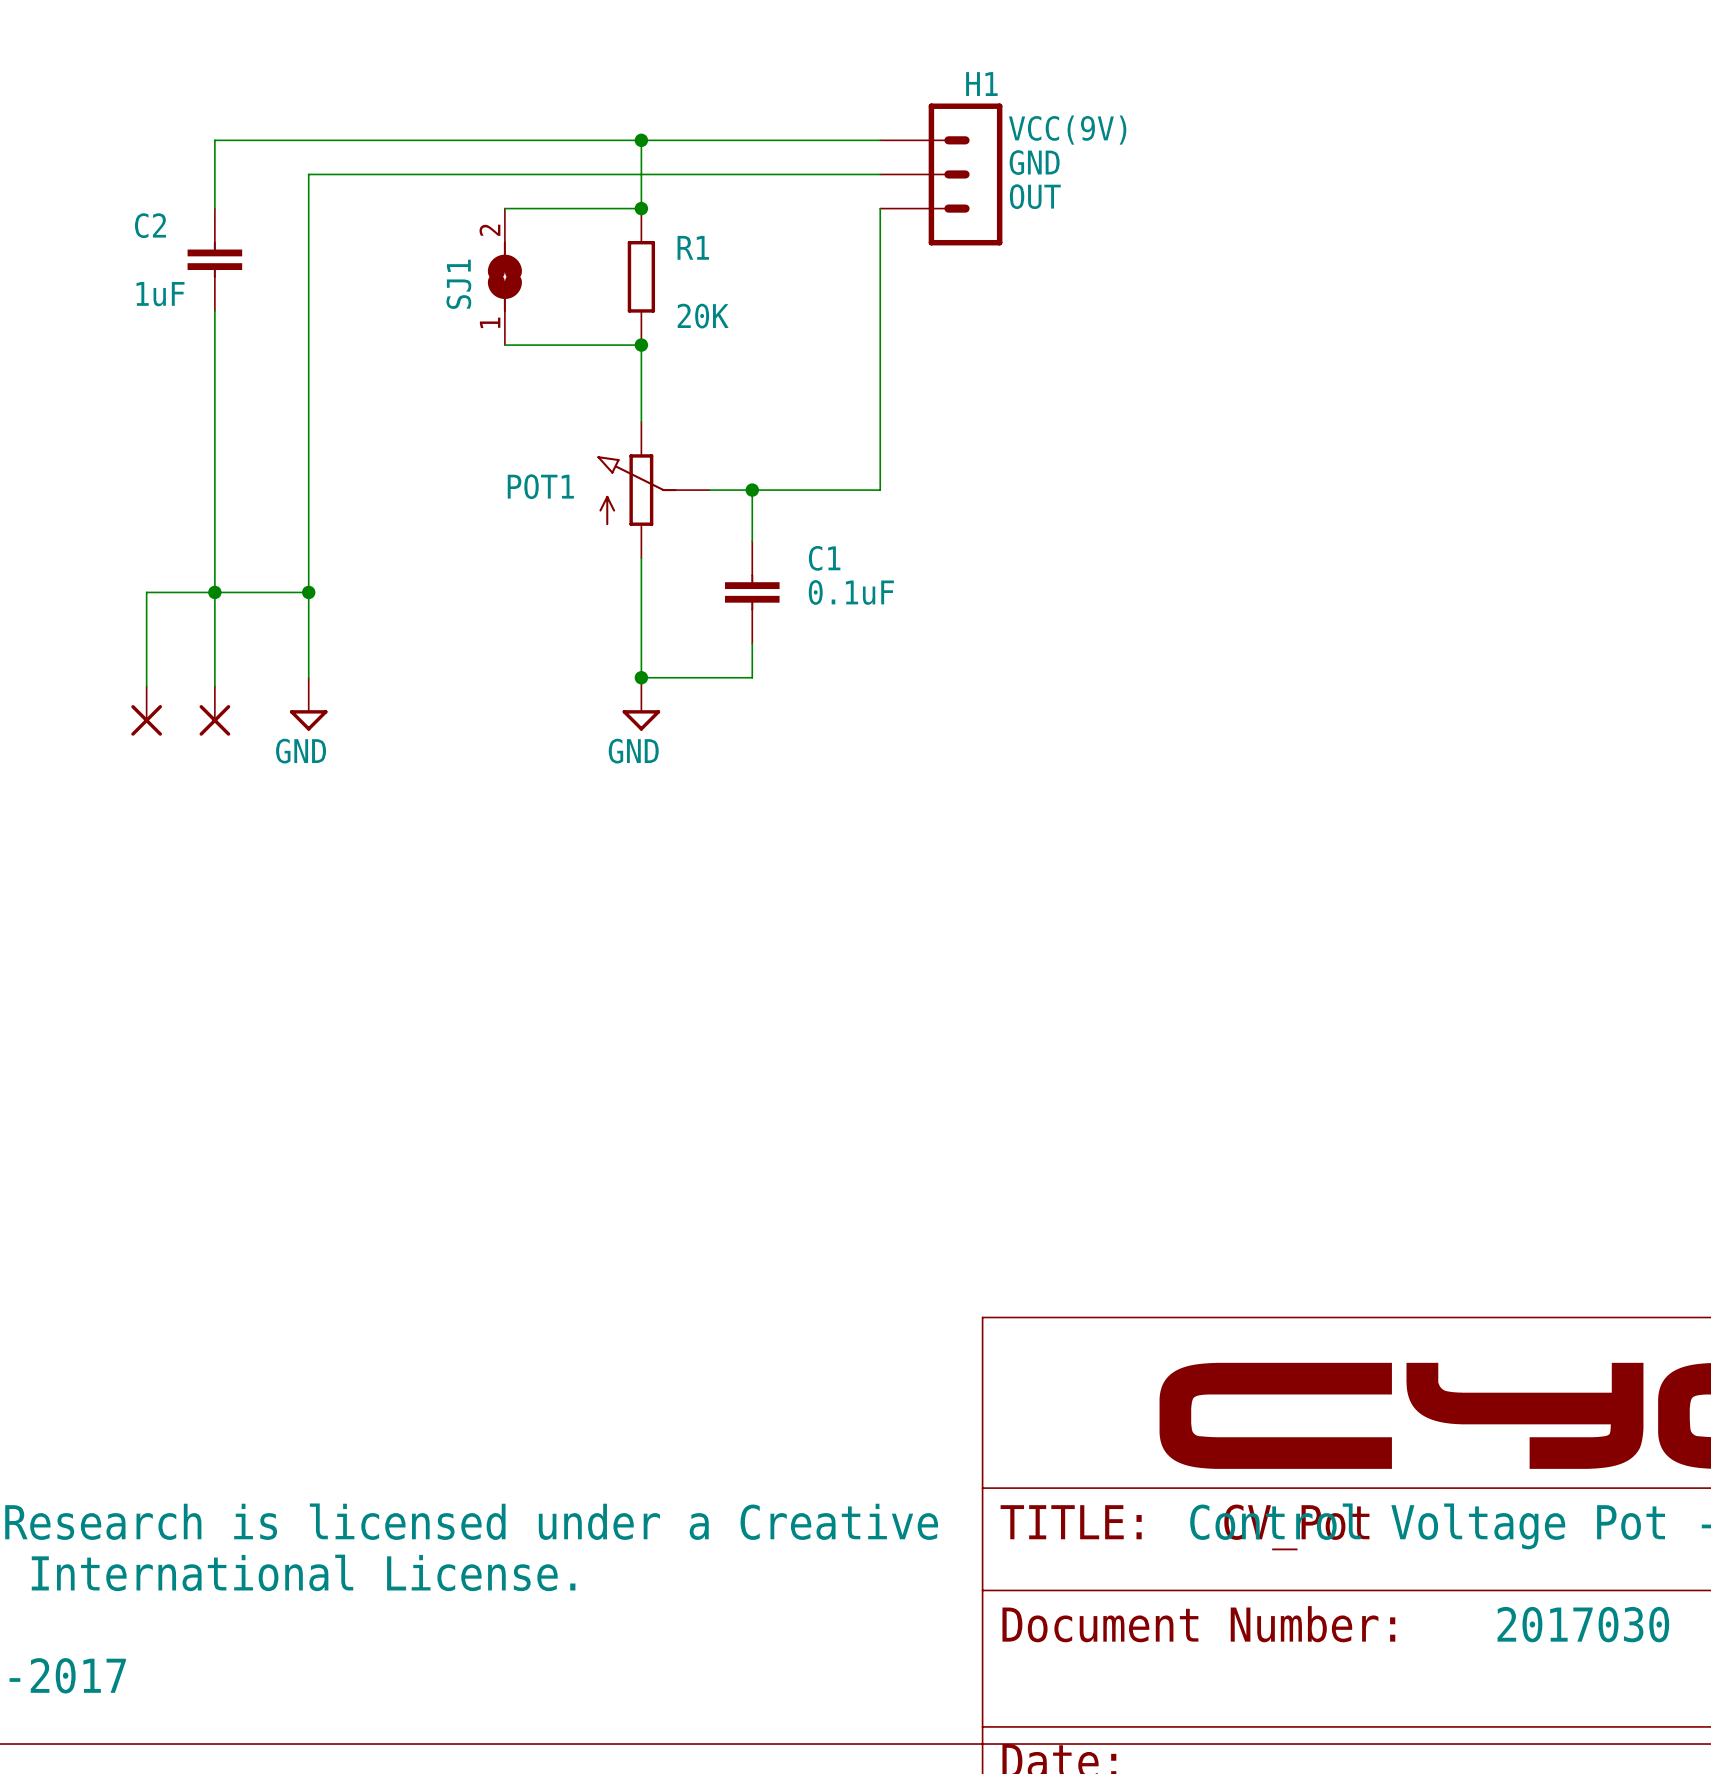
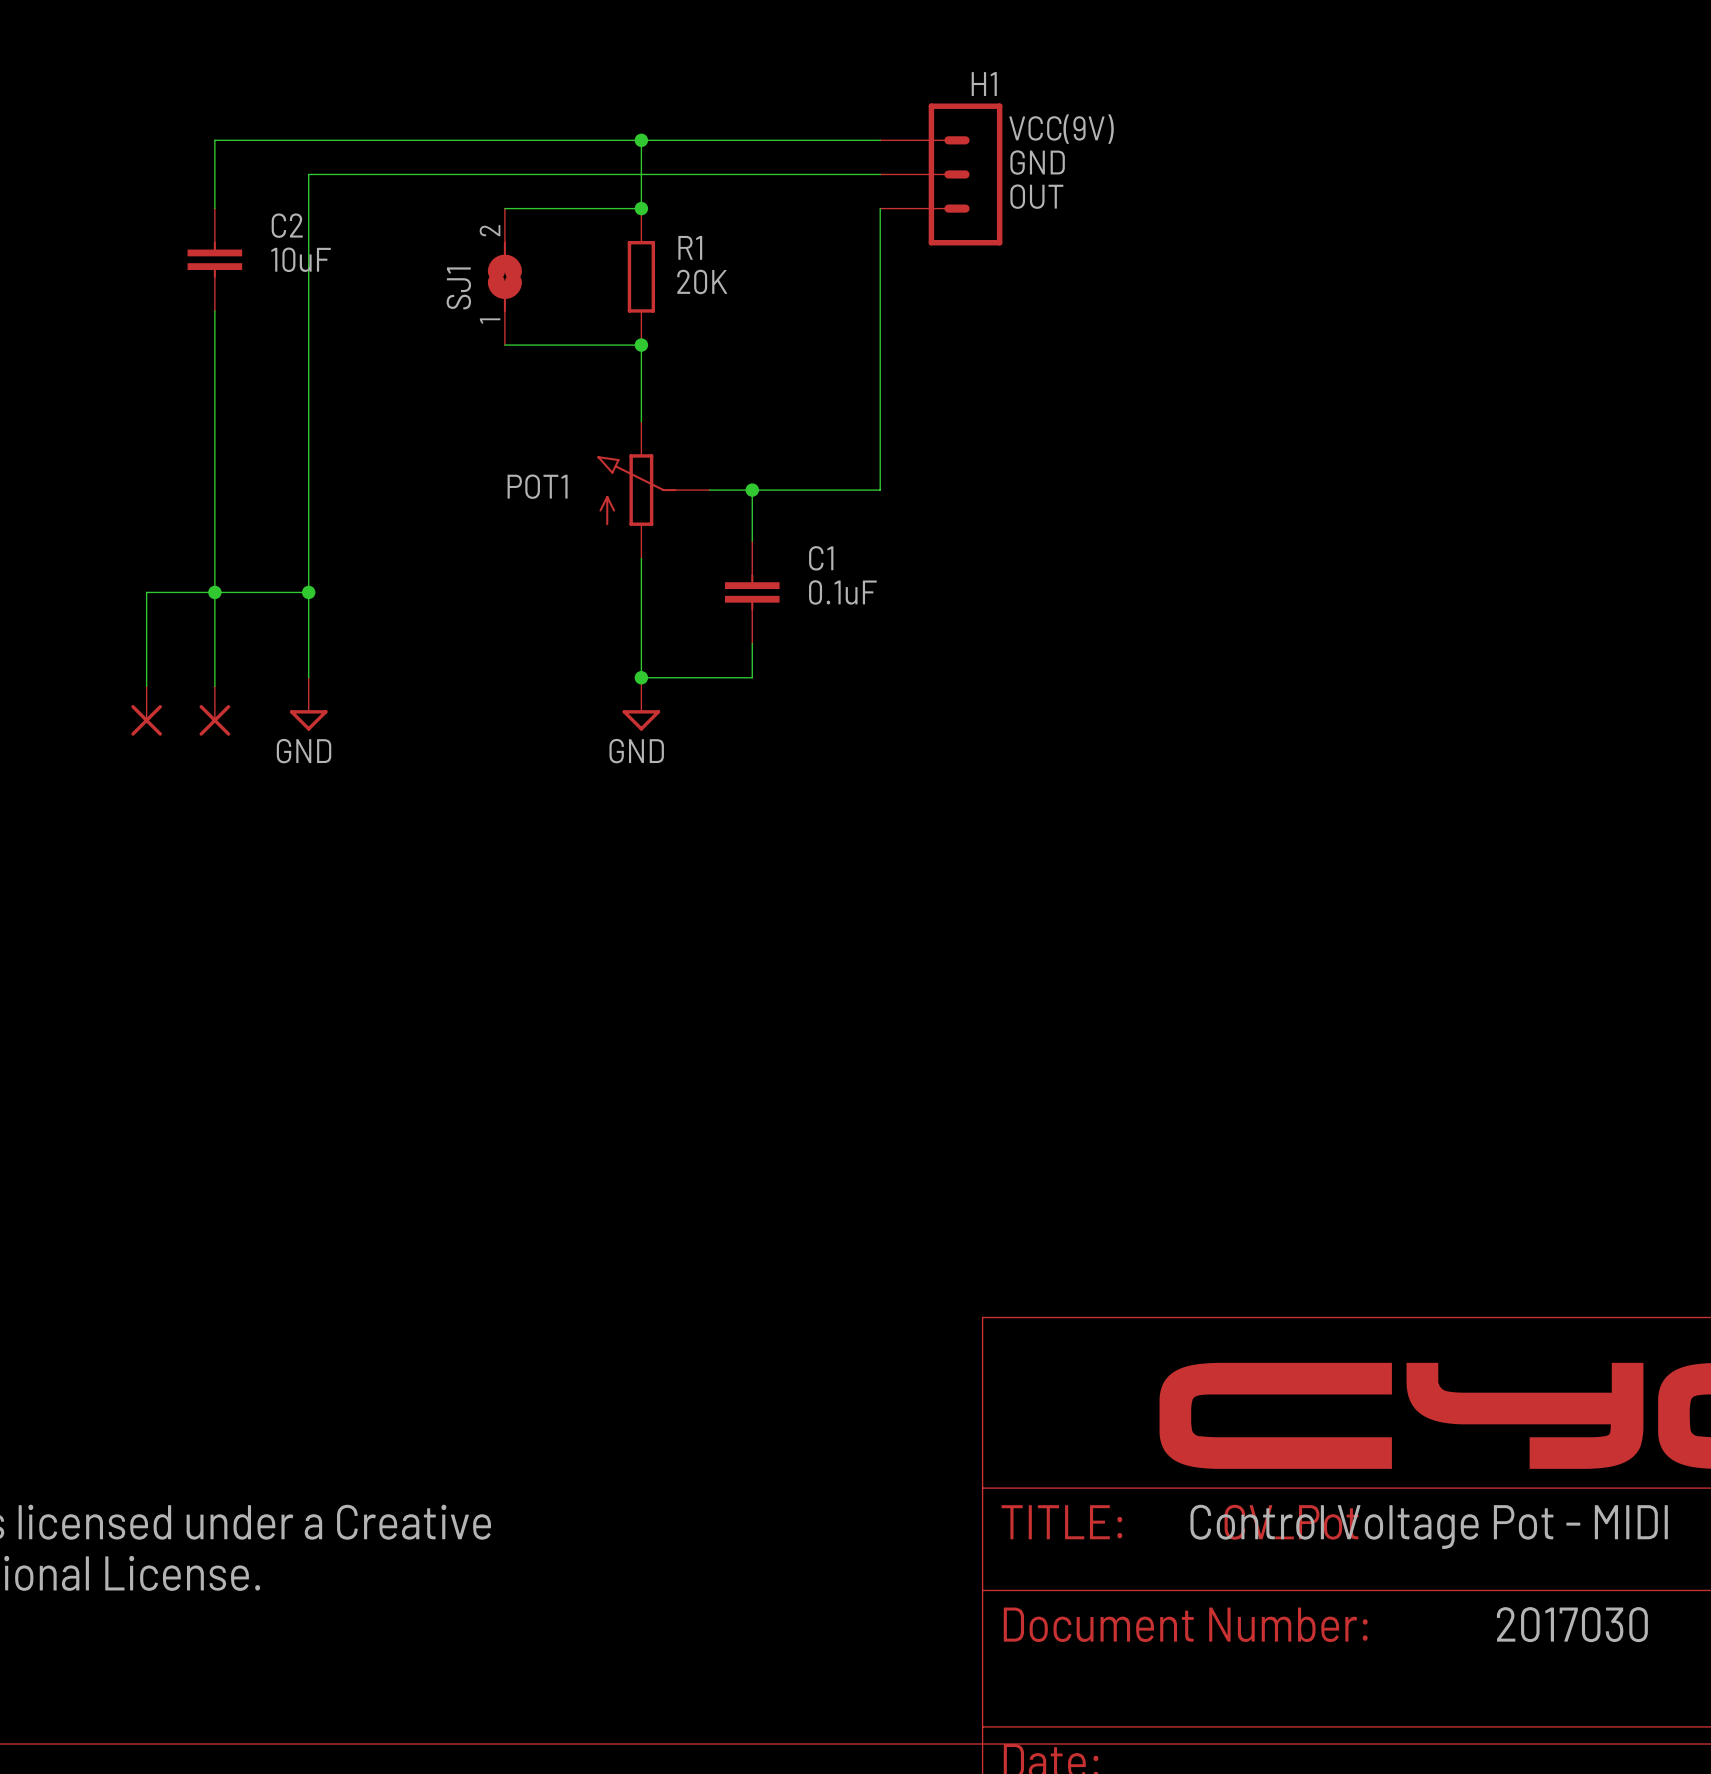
C2 name position: C2 (150, 225) -> C2 (287, 225)
C2 value: 1uF (160, 294) -> 10uF (301, 259)
R1 value position: 20K (703, 316) -> 20K (702, 281)

